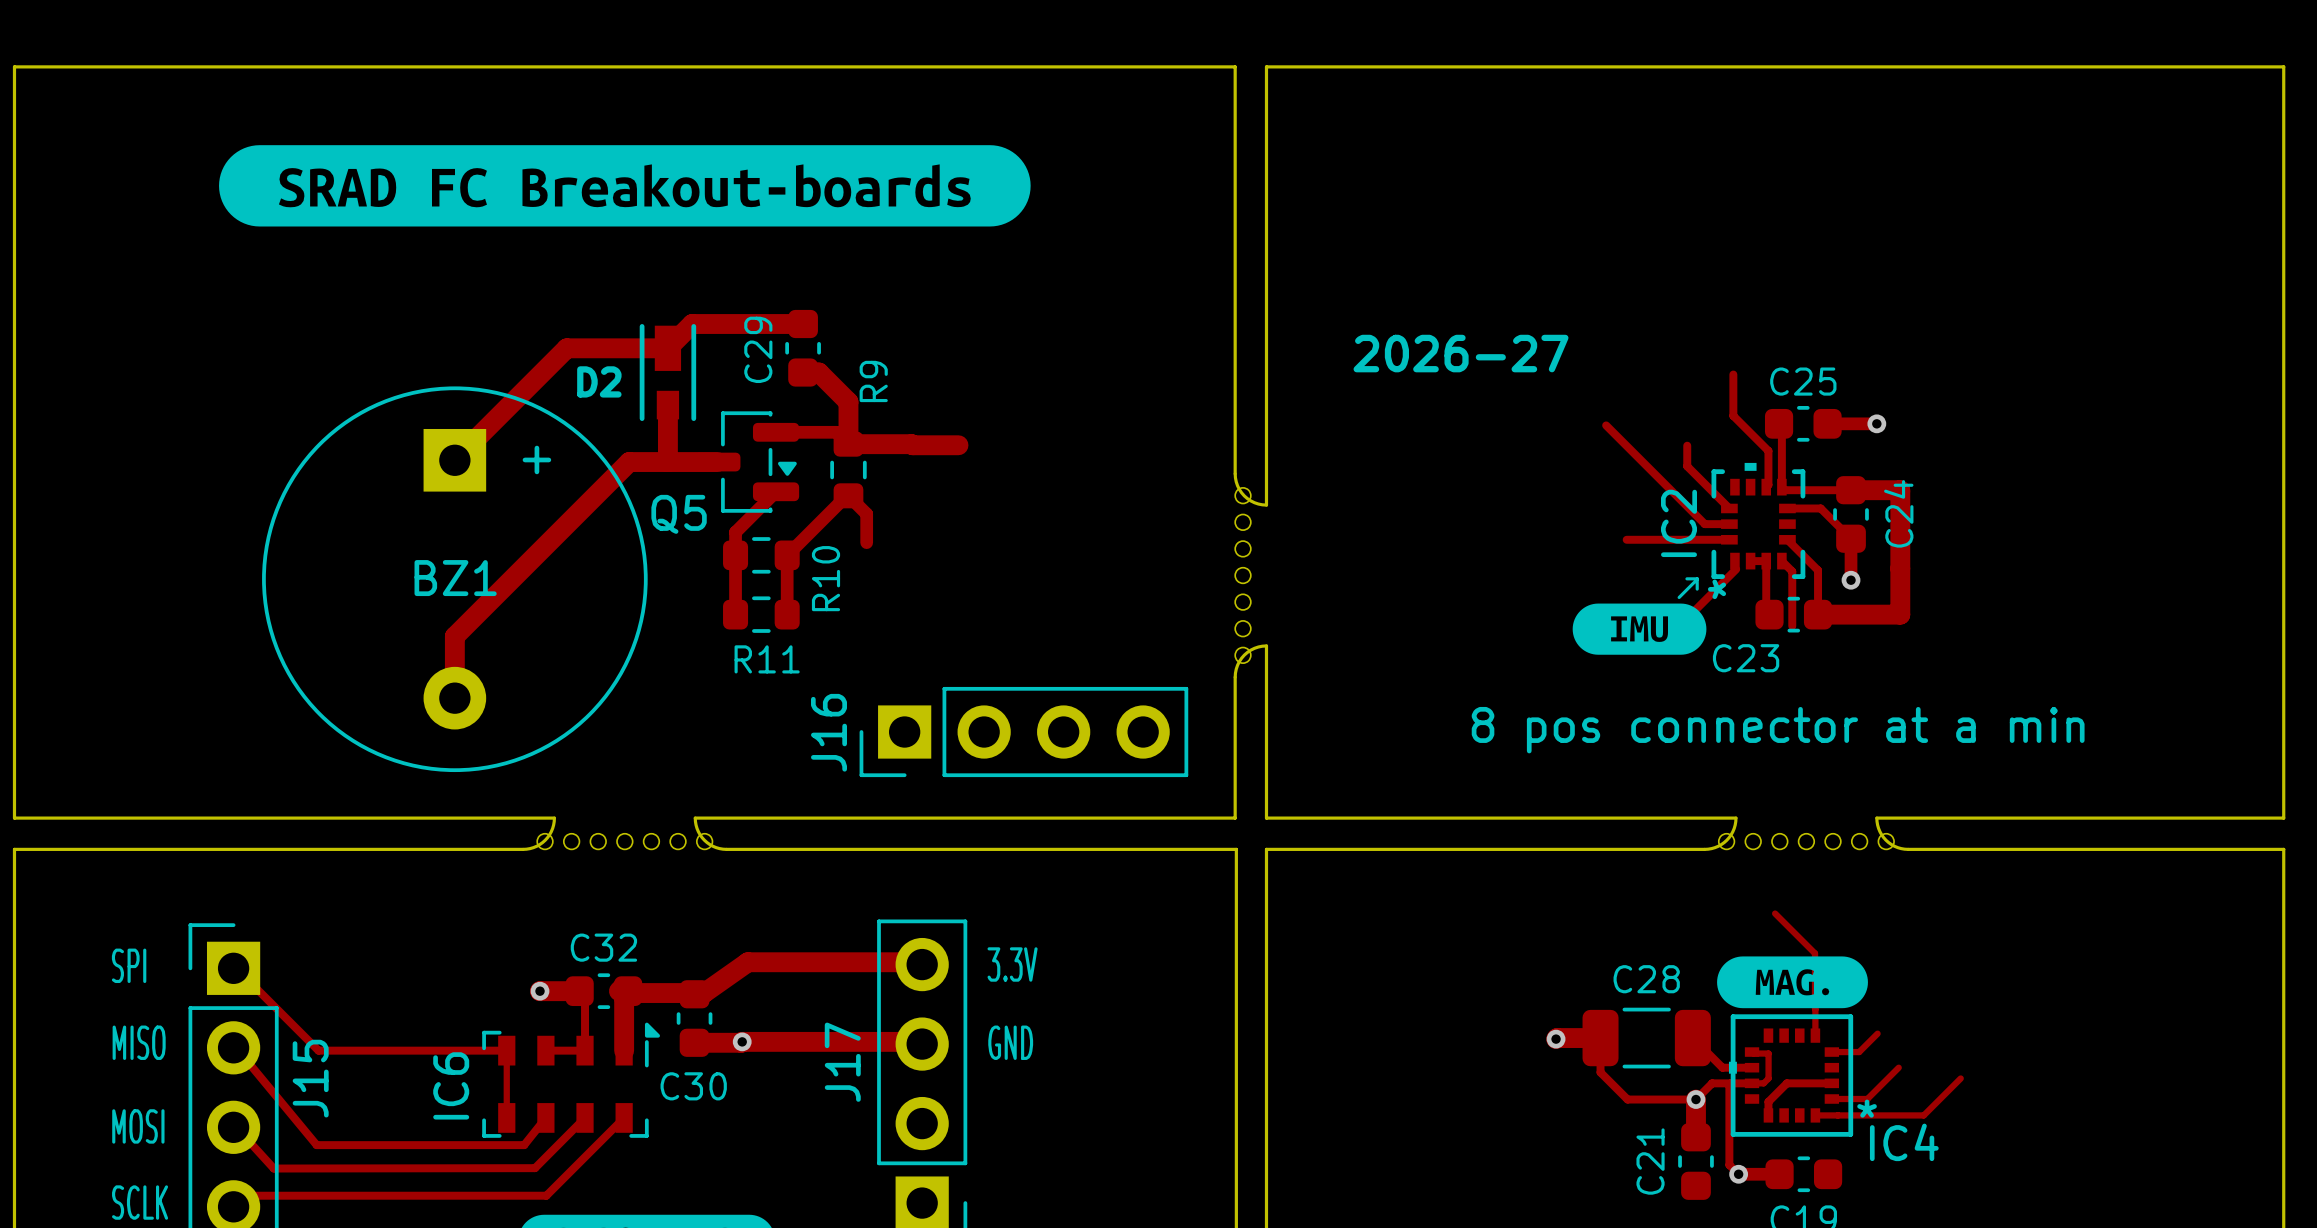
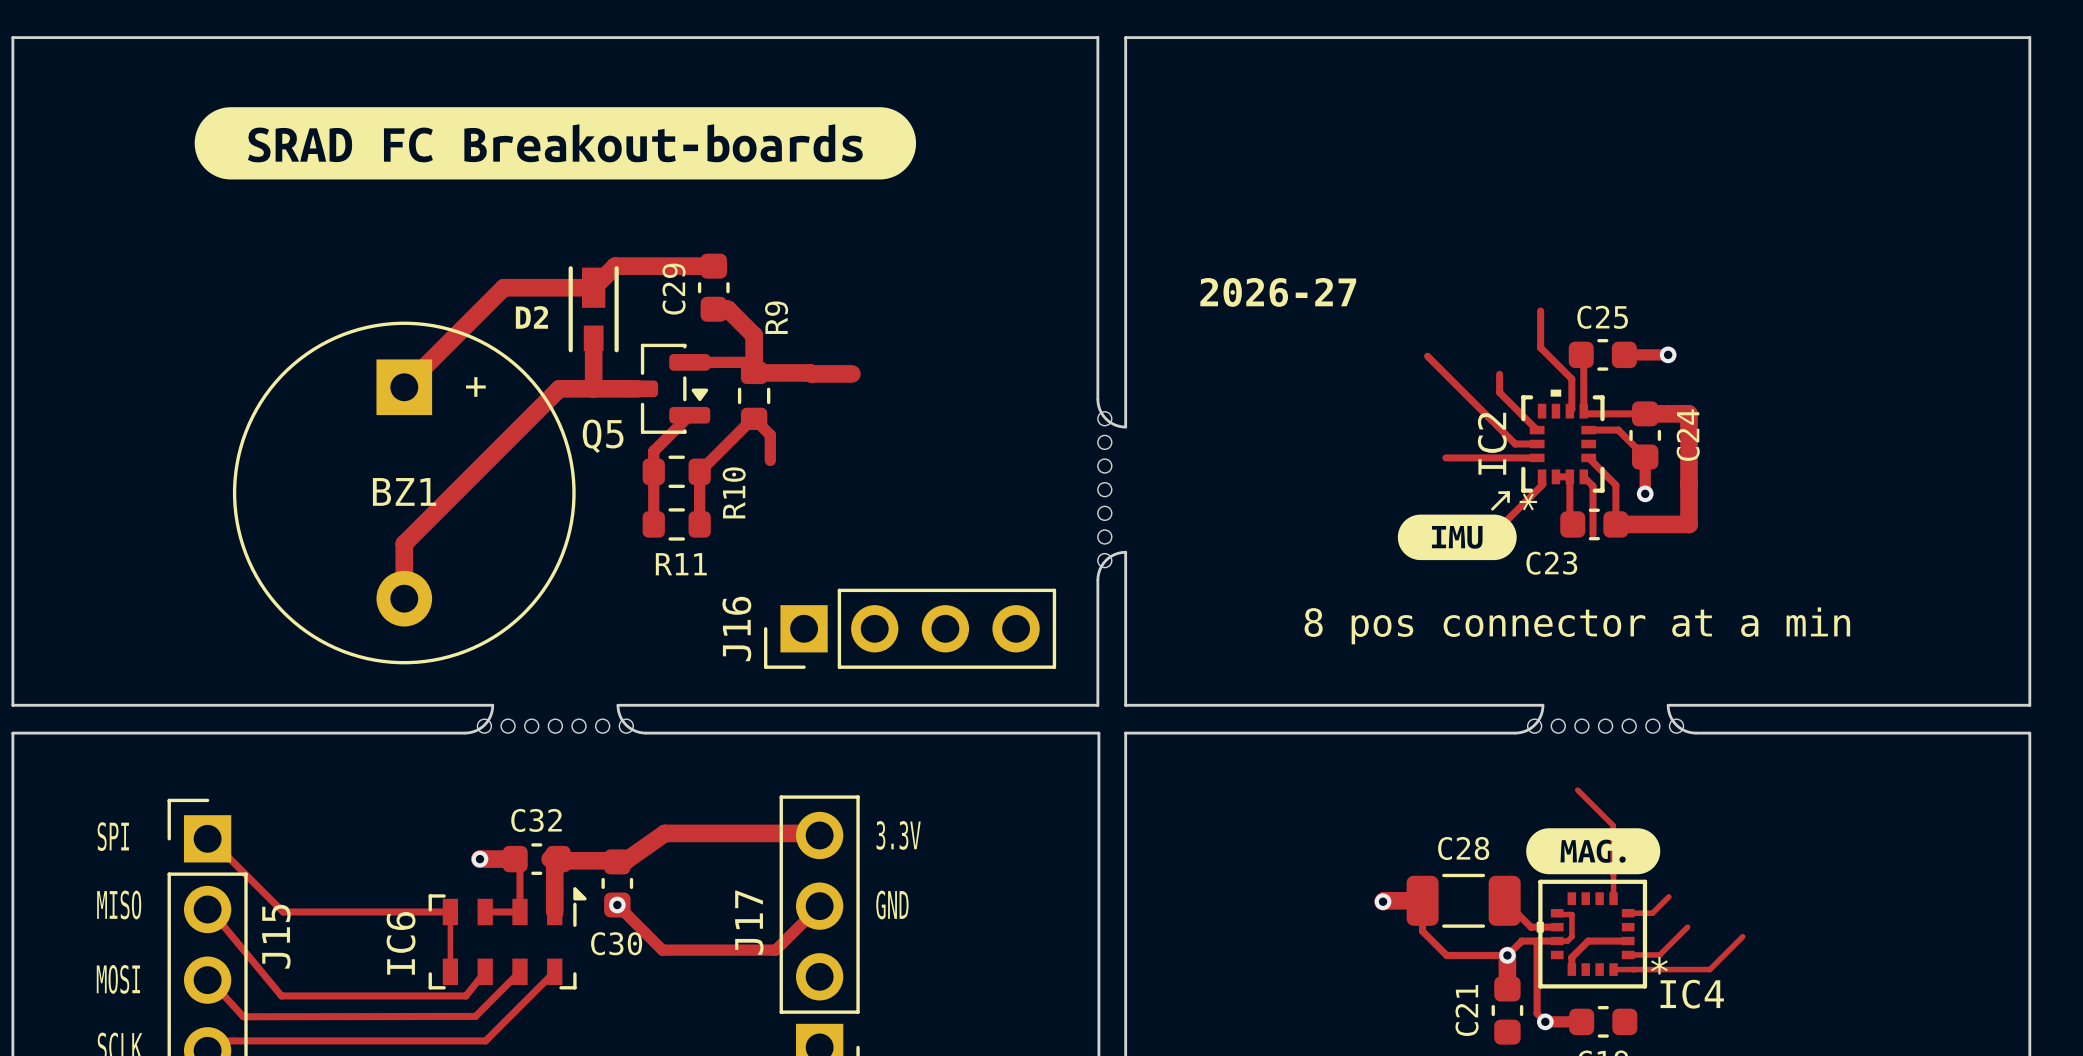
via position: (742, 1041) -> (617, 905)
track: (694, 1042) (919, 1041) (922, 1044) -> (617, 905) (662, 950) (775, 950) (819, 906)

